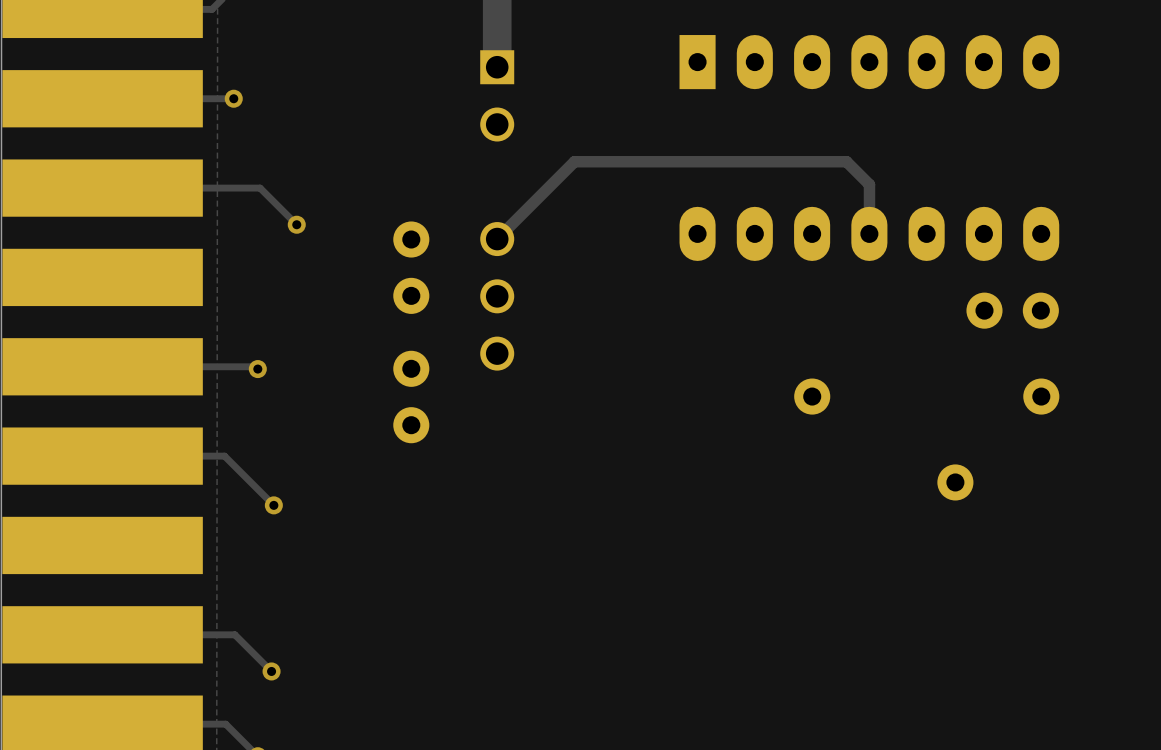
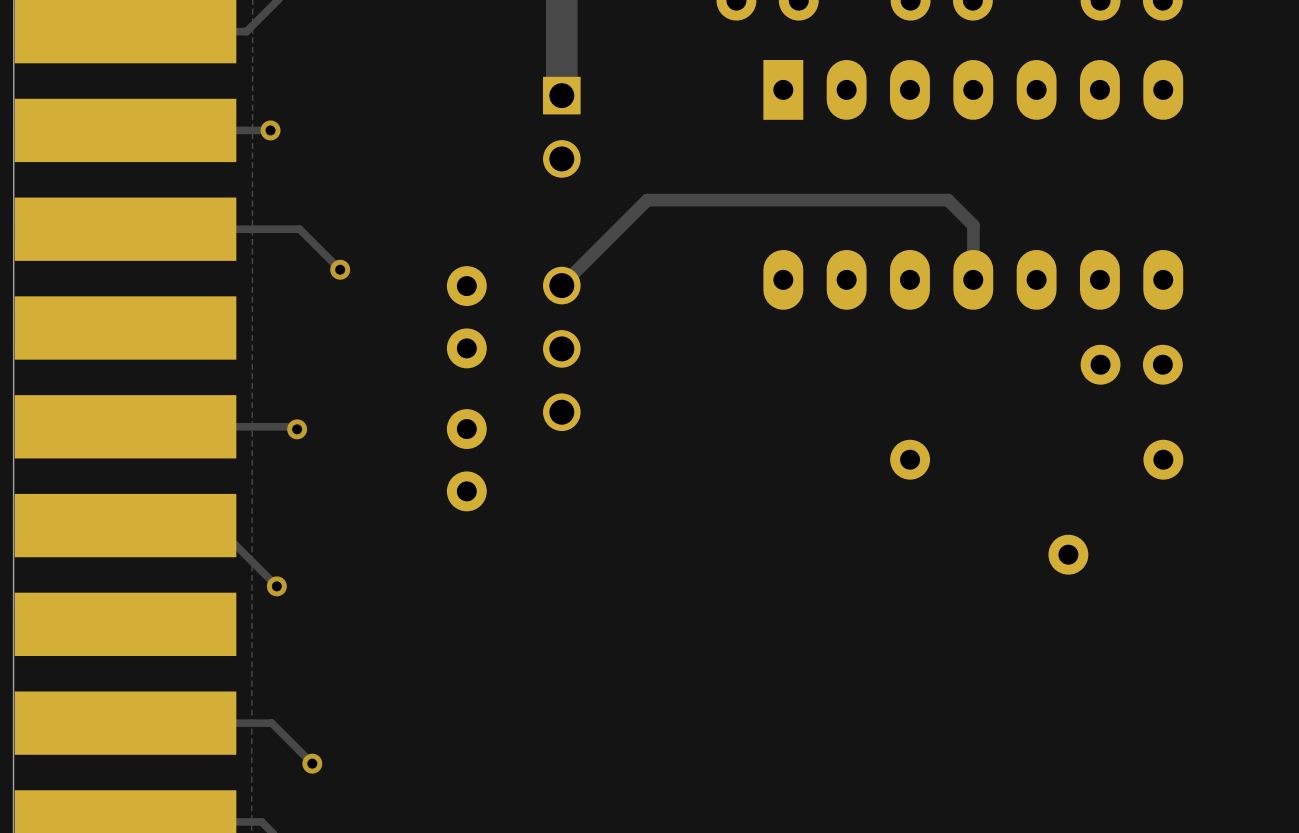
track: (184, 456) (224, 456) (273, 505) -> (216, 525) (276, 586)
via position: (273, 505) -> (276, 586)

